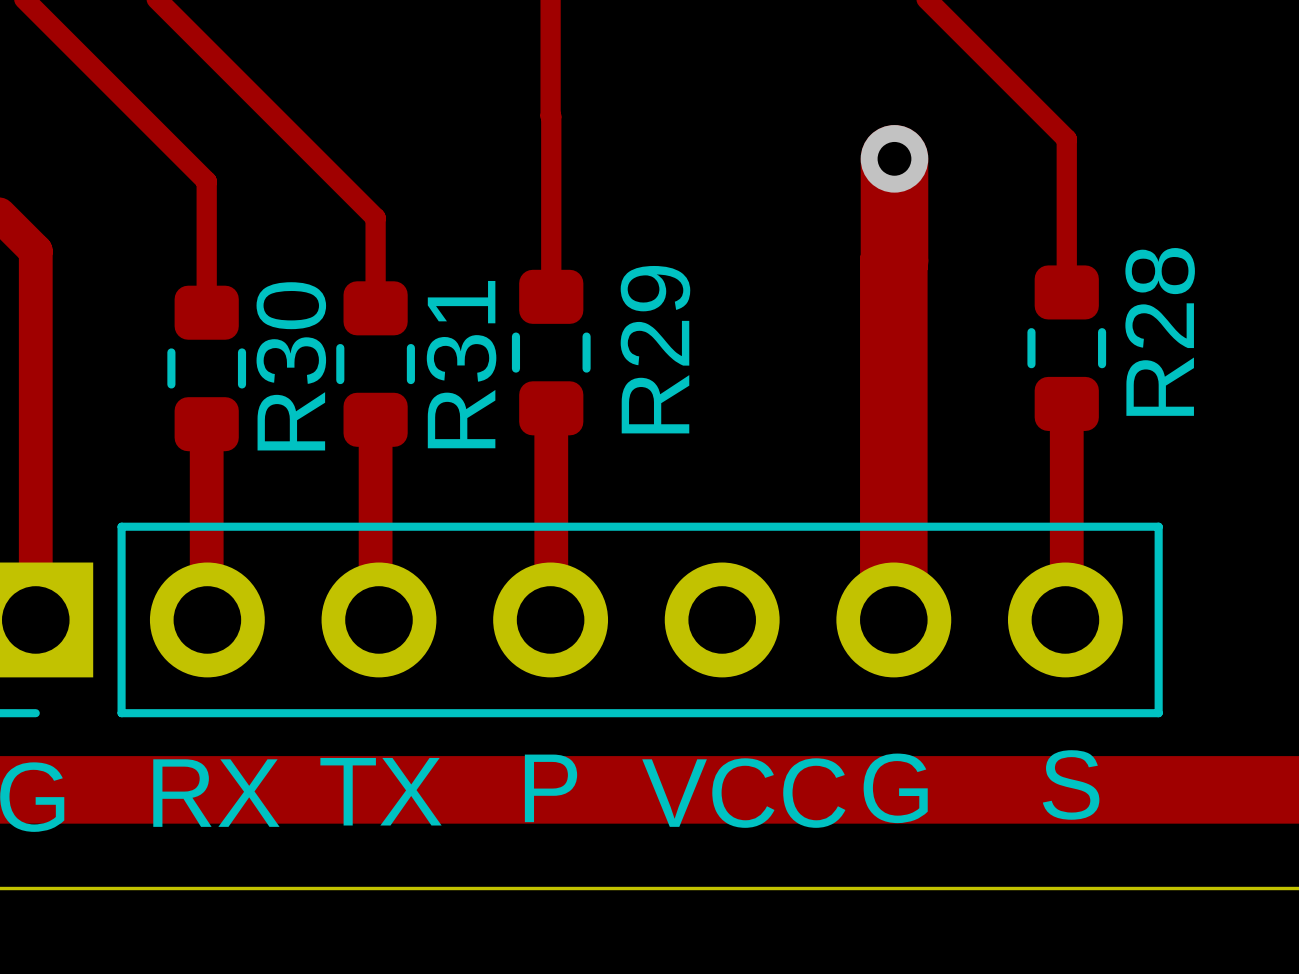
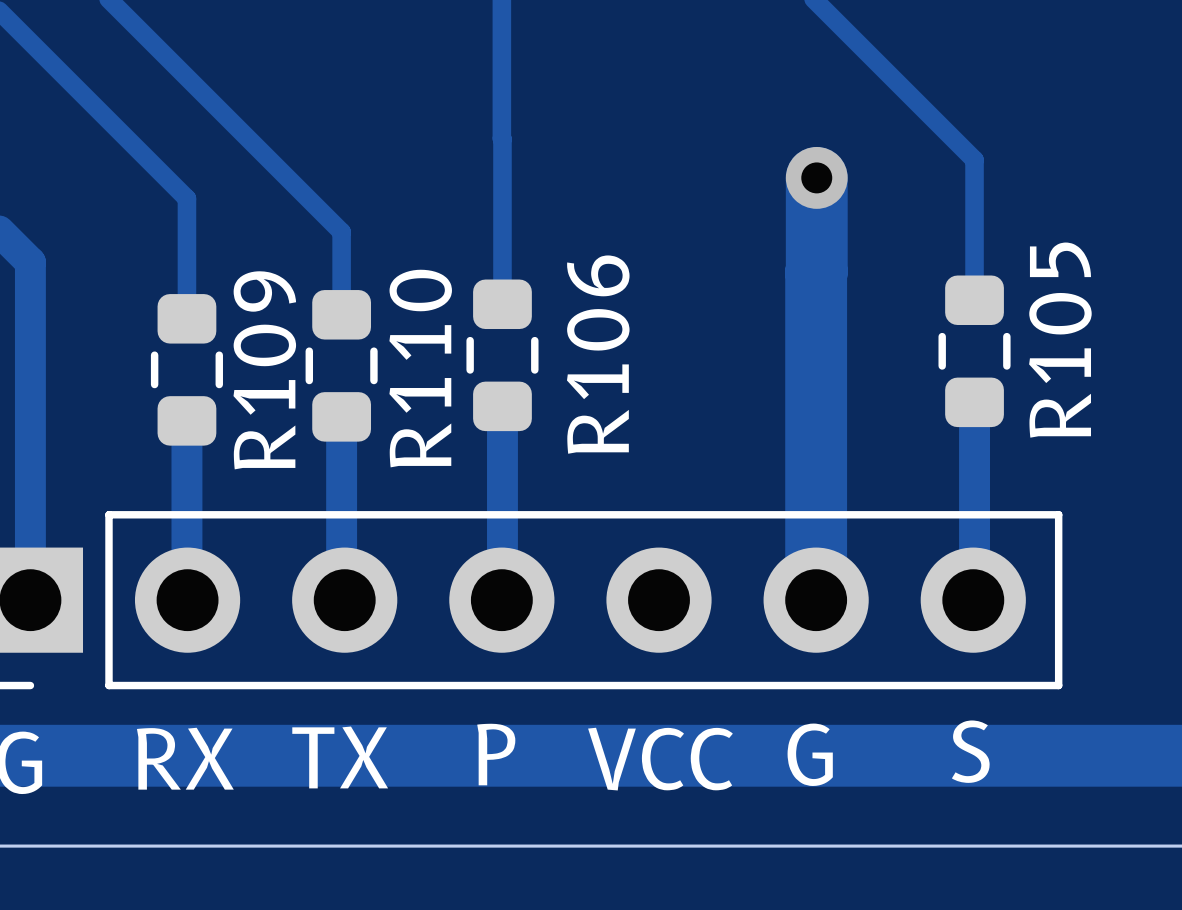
R28 name: R28 (1160, 331) -> R105 (1060, 340)
R29 name: R29 (655, 349) -> R106 (598, 354)
R31 name: R31 (461, 364) -> R110 (420, 368)
R30 name: R30 (291, 366) -> R109 (264, 370)

